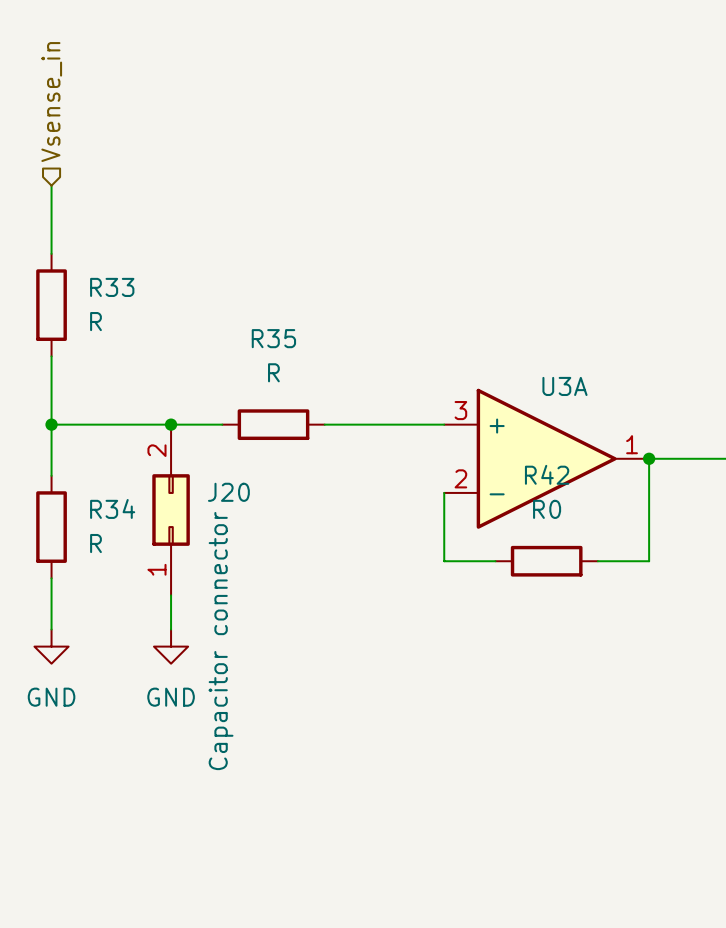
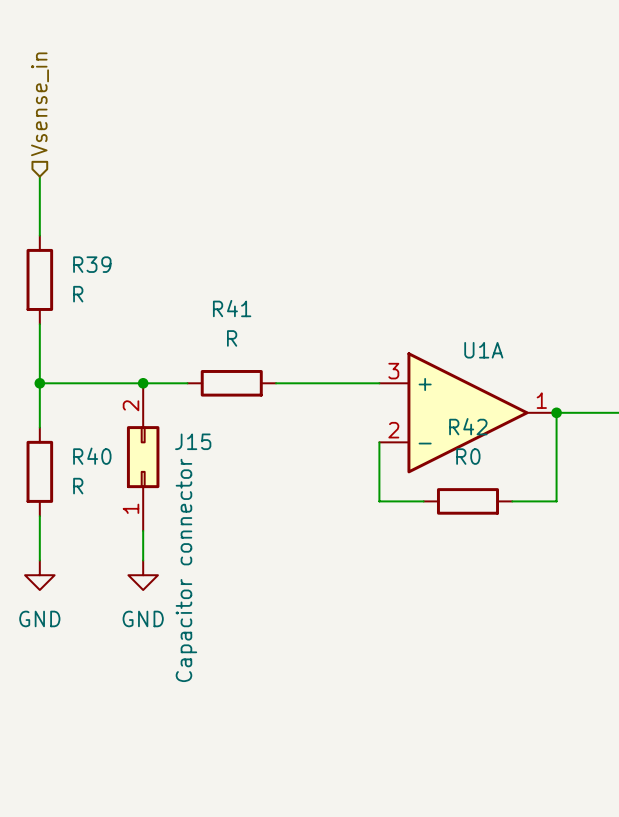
R33 name: R33 (112, 287) -> R39 (92, 264)
R35 name: R35 (273, 338) -> R41 (232, 308)
U3A name: U3A (564, 386) -> U1A (483, 350)
J20 name: J20 (228, 492) -> J15 (193, 441)
R34 name: R34 (112, 508) -> R40 (92, 456)

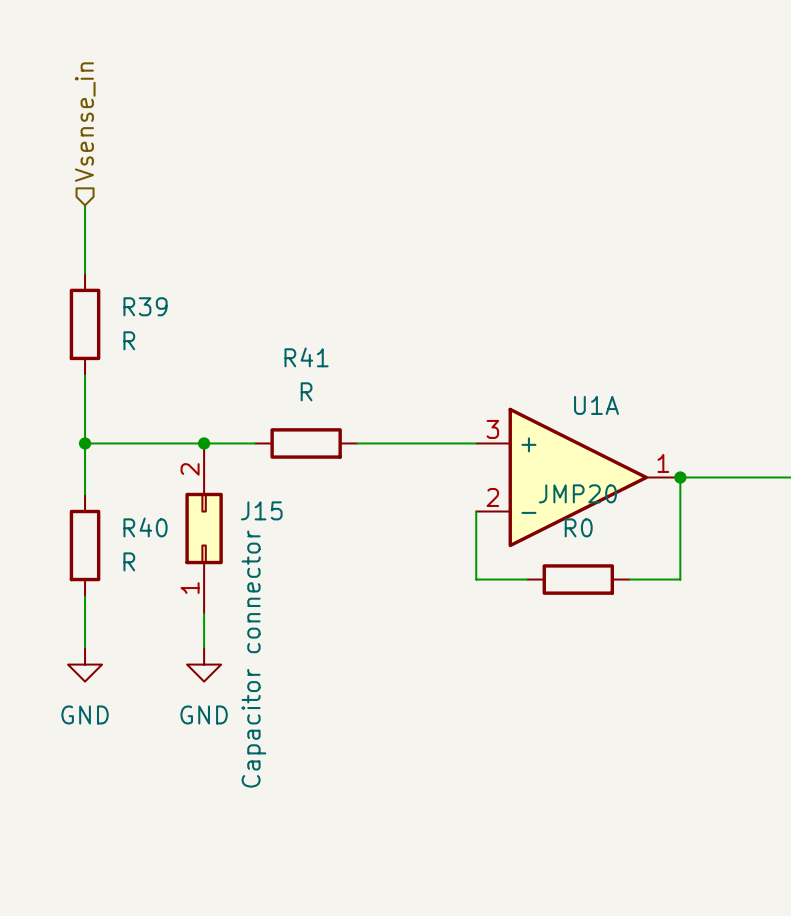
R42 name: R42 (468, 426) -> JMP20 (577, 493)

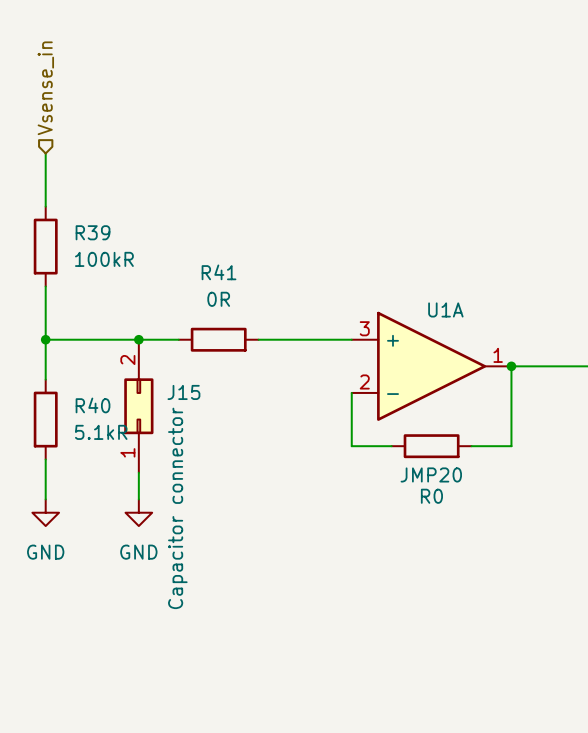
R39 value: R (129, 340) -> 100kR (104, 259)
R41 value: R (306, 391) -> 0R (218, 299)
JMP20 name position: JMP20 (577, 493) -> JMP20 (431, 474)
JMP20 value position: R0 (578, 527) -> R0 (431, 496)
R40 value: R (129, 561) -> 5.1kR (101, 432)

